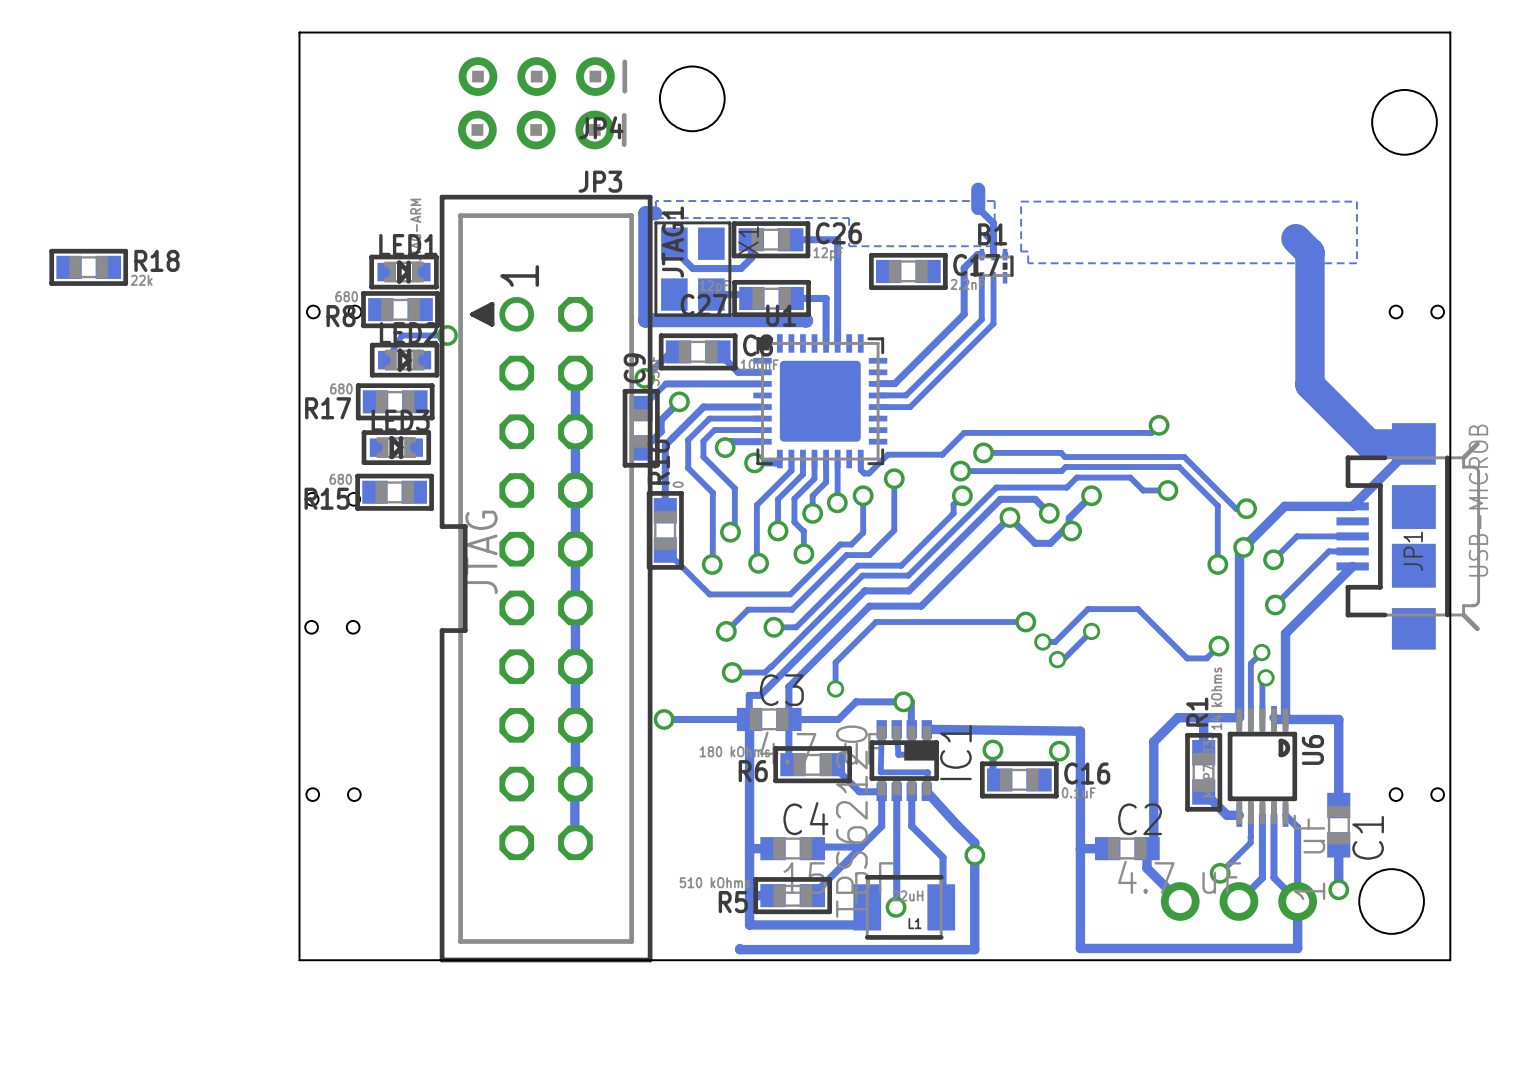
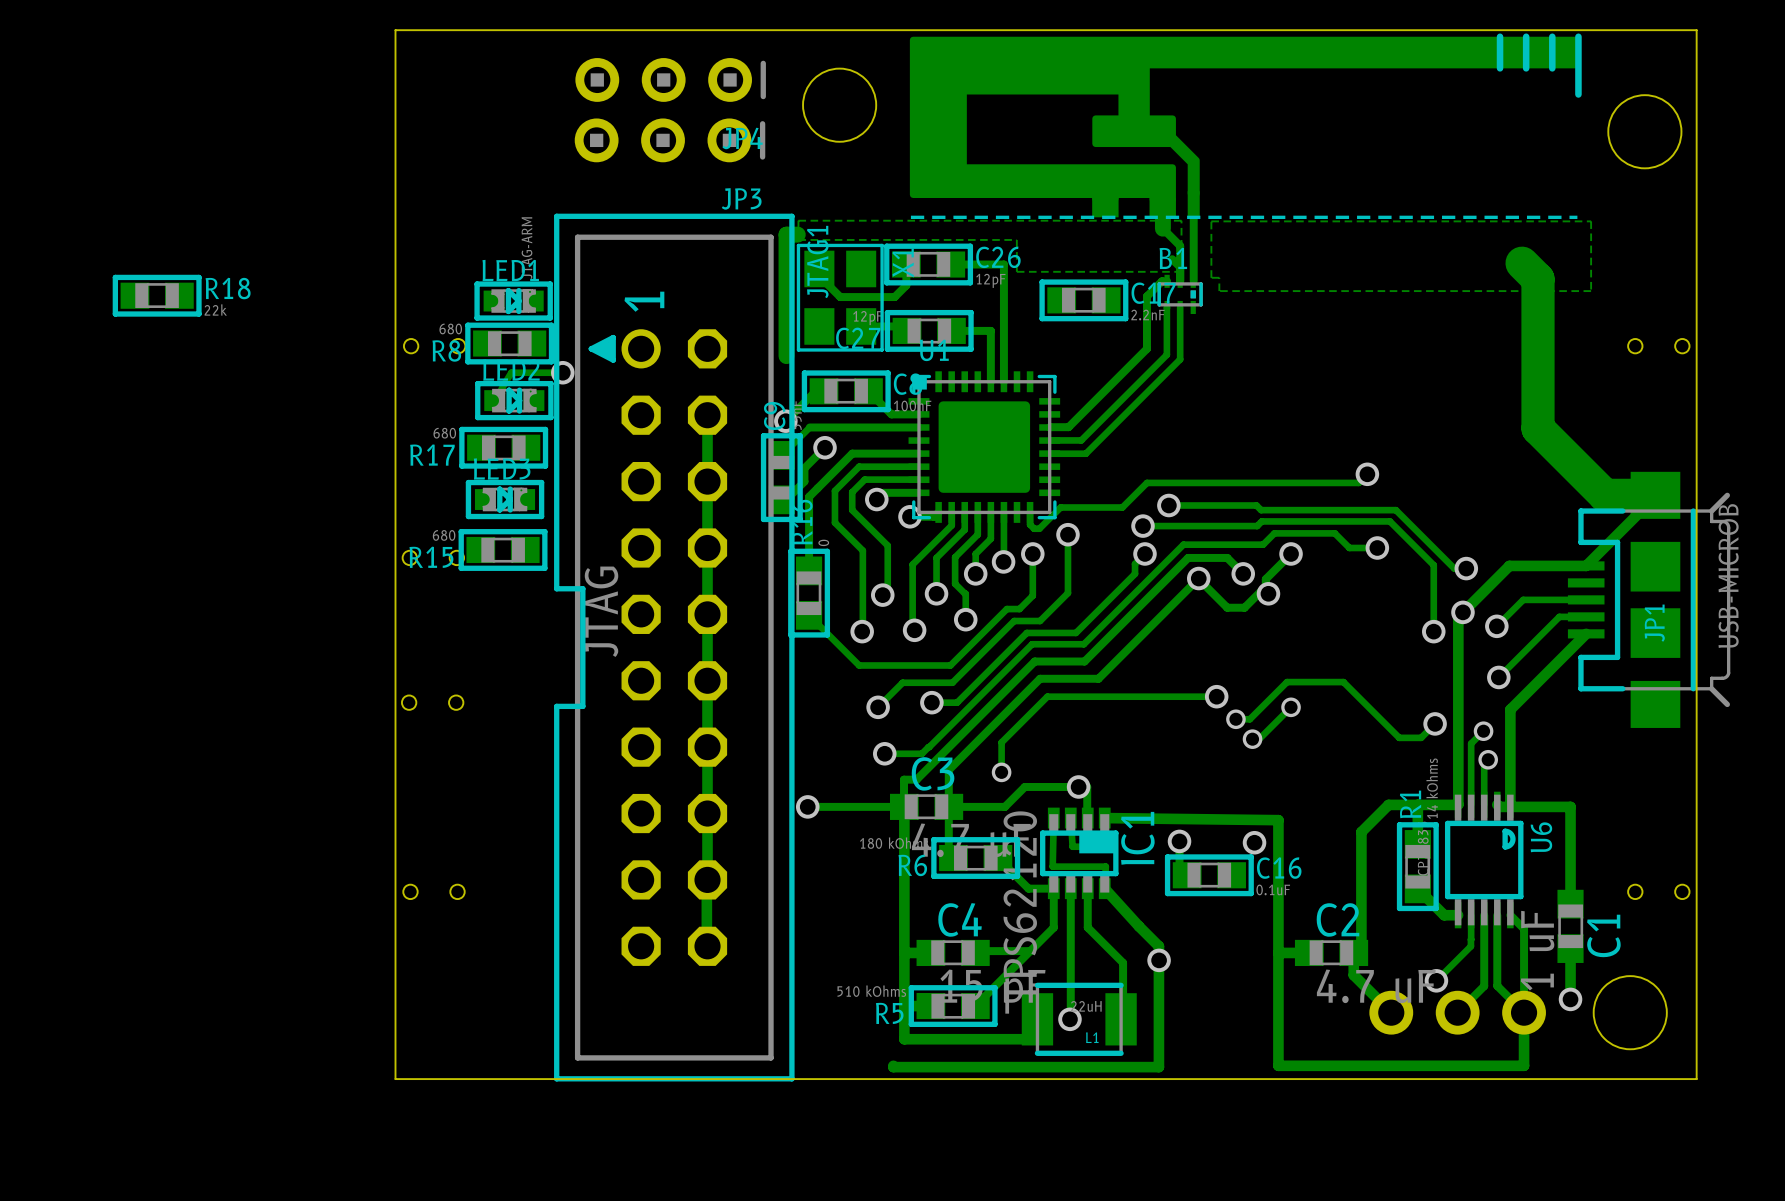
part: none -> (1245, 126)
track: none -> (1193, 204) (1193, 280)
track: (645, 320) (806, 320) -> none

